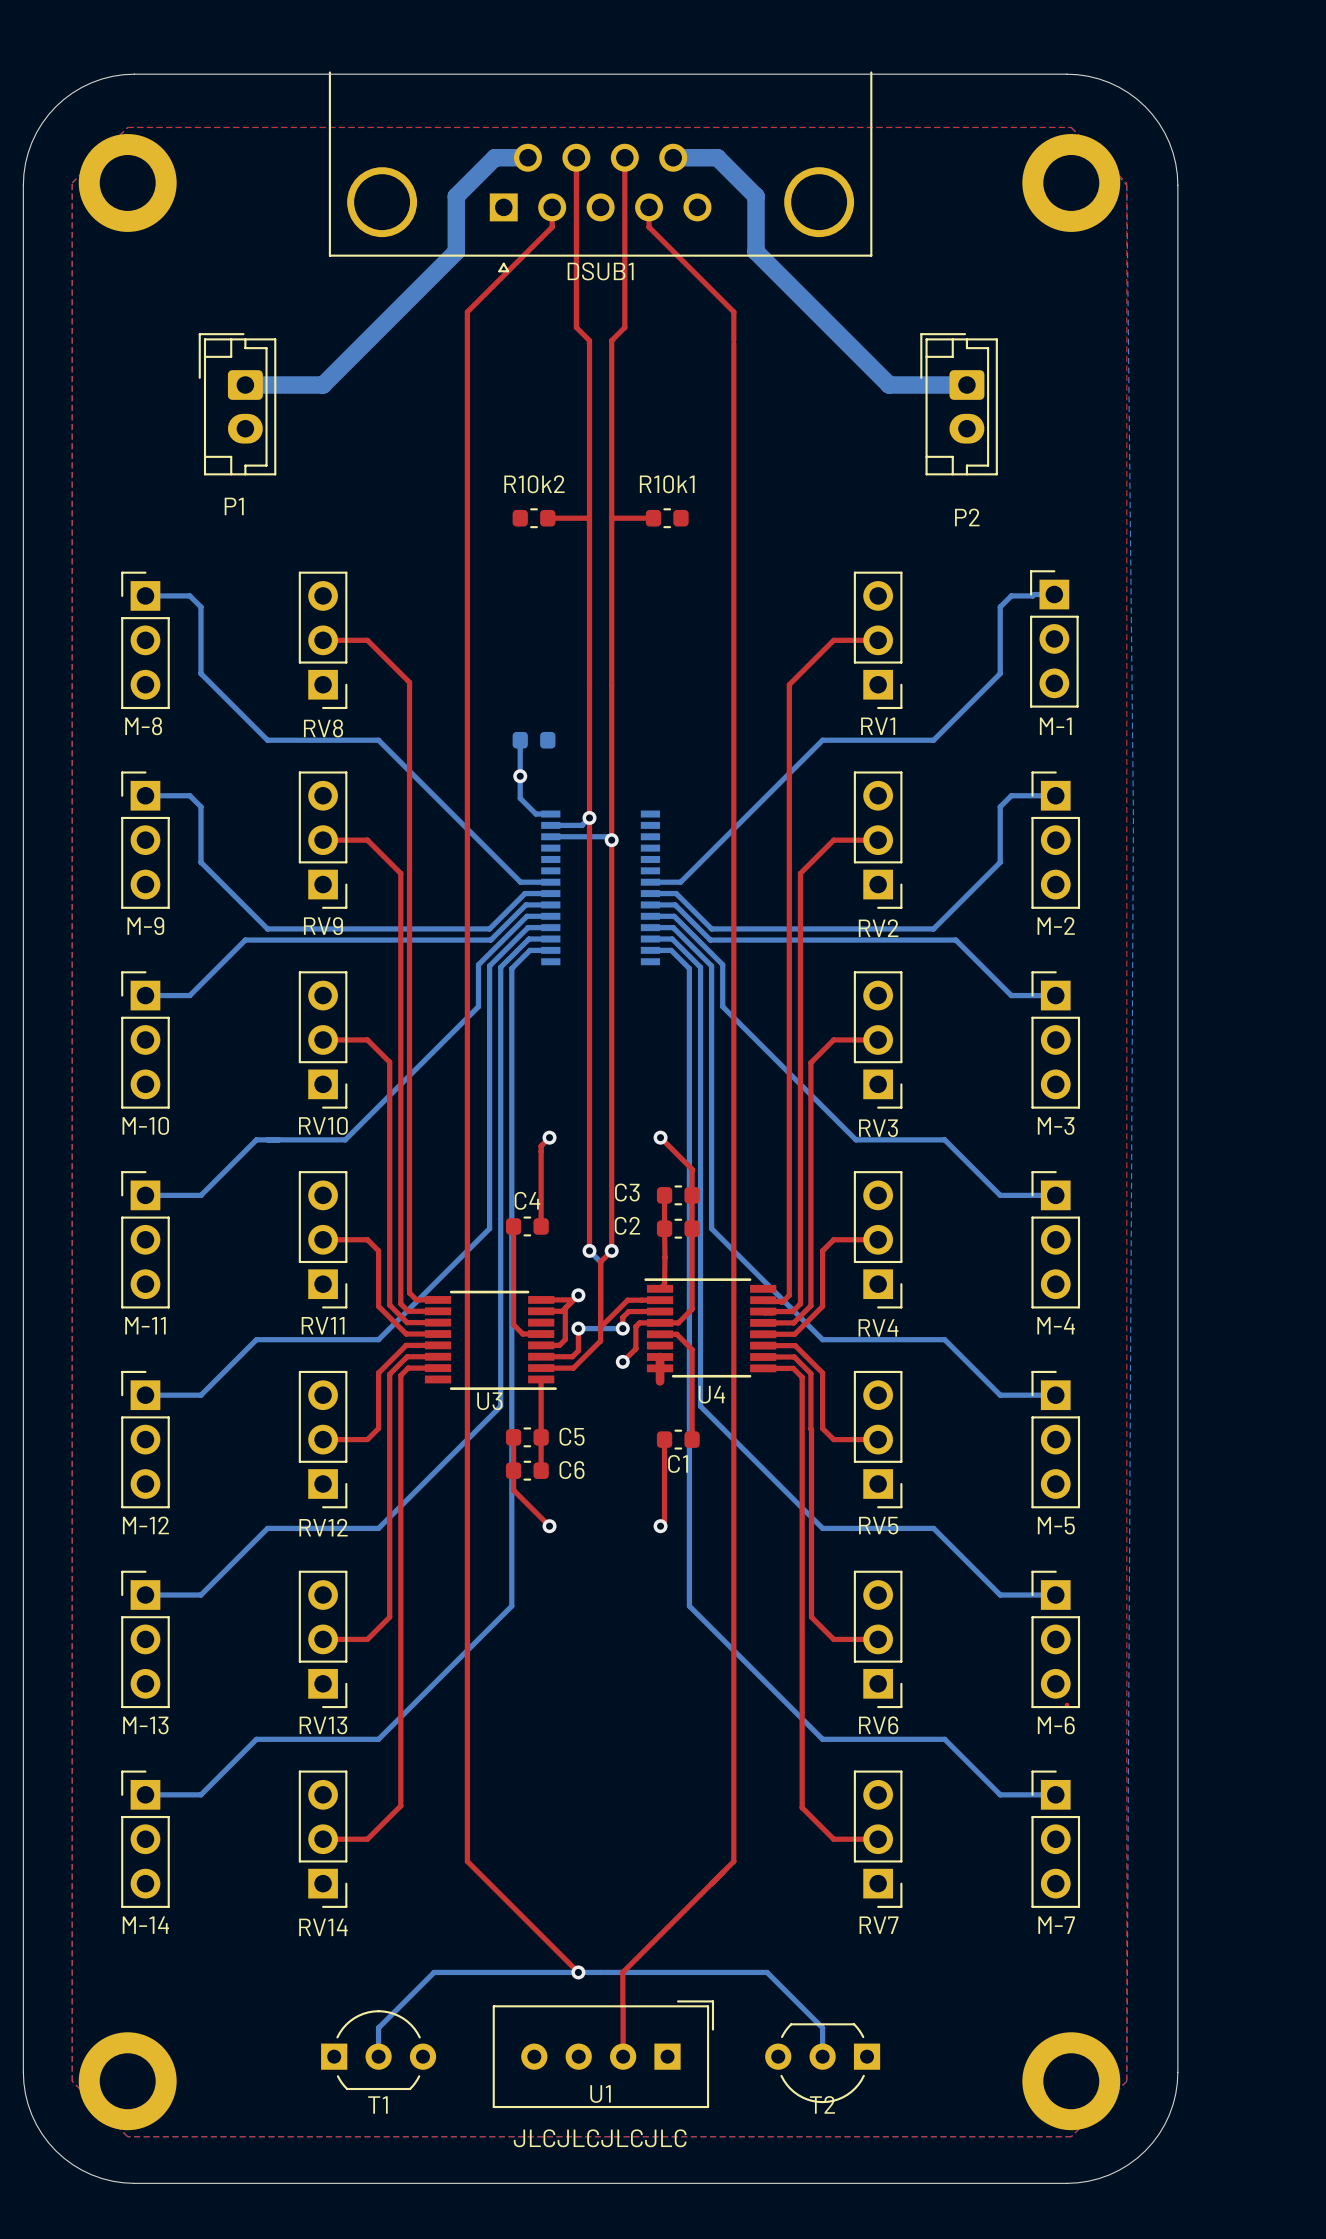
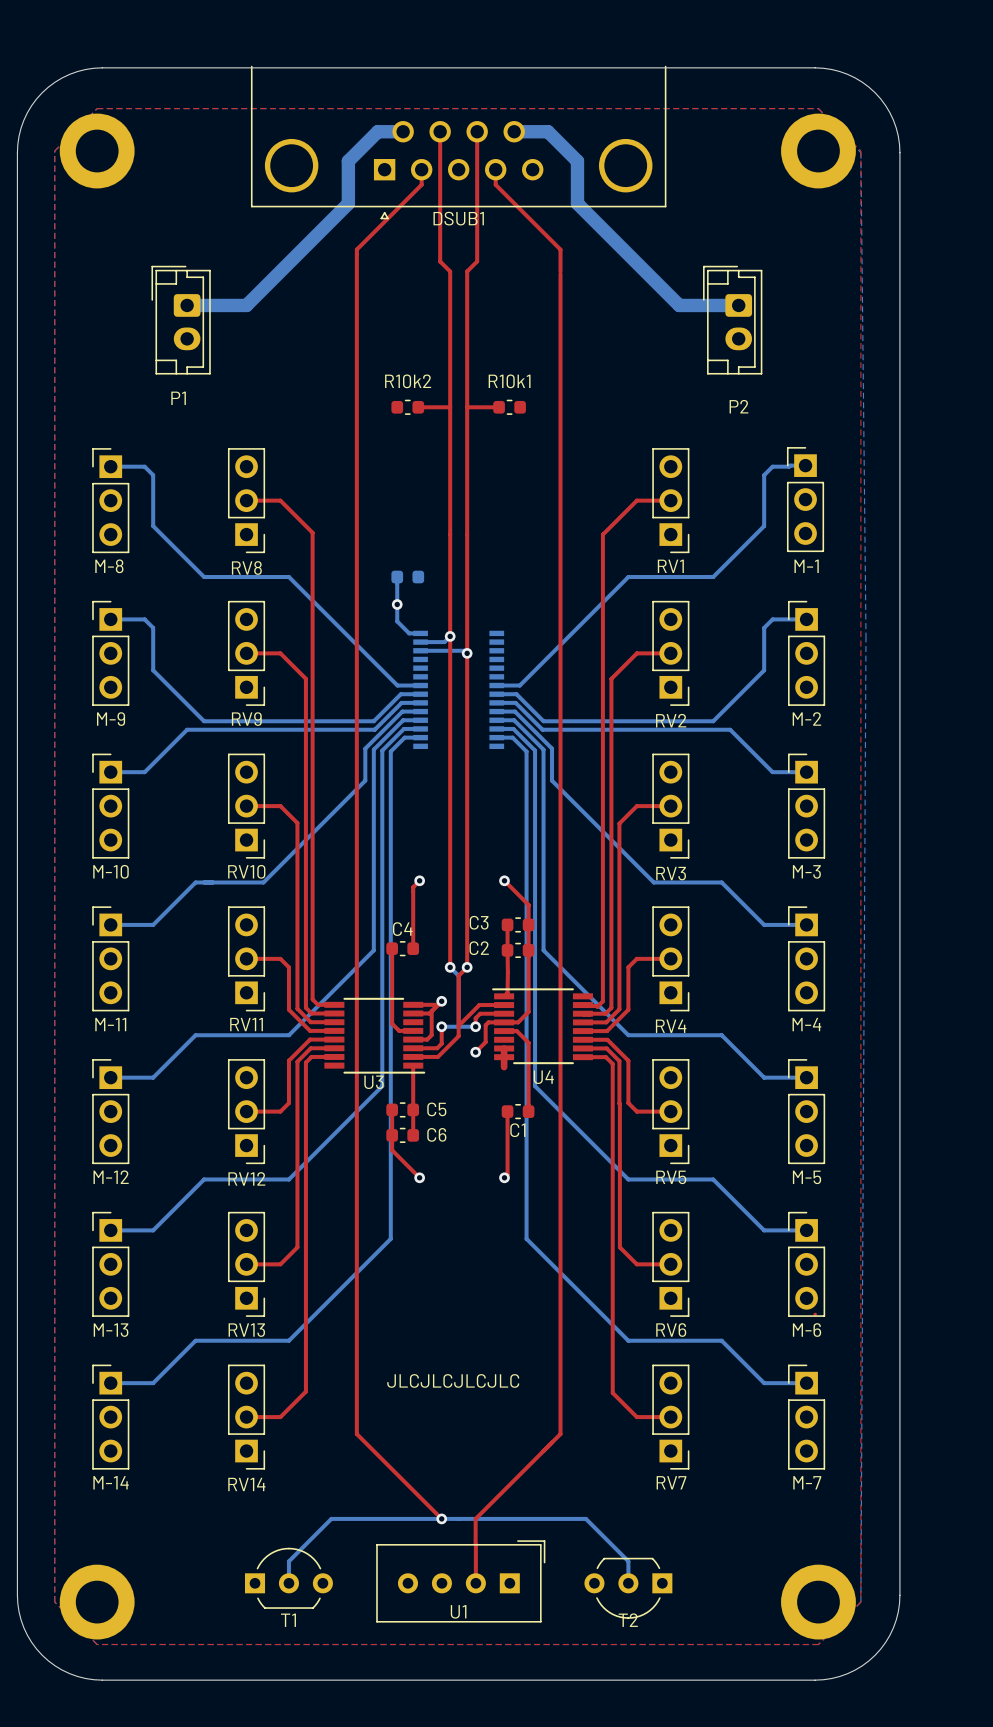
text position: JLCJLCJLCJLC (600, 2138) -> JLCJLCJLCJLC (453, 1380)

